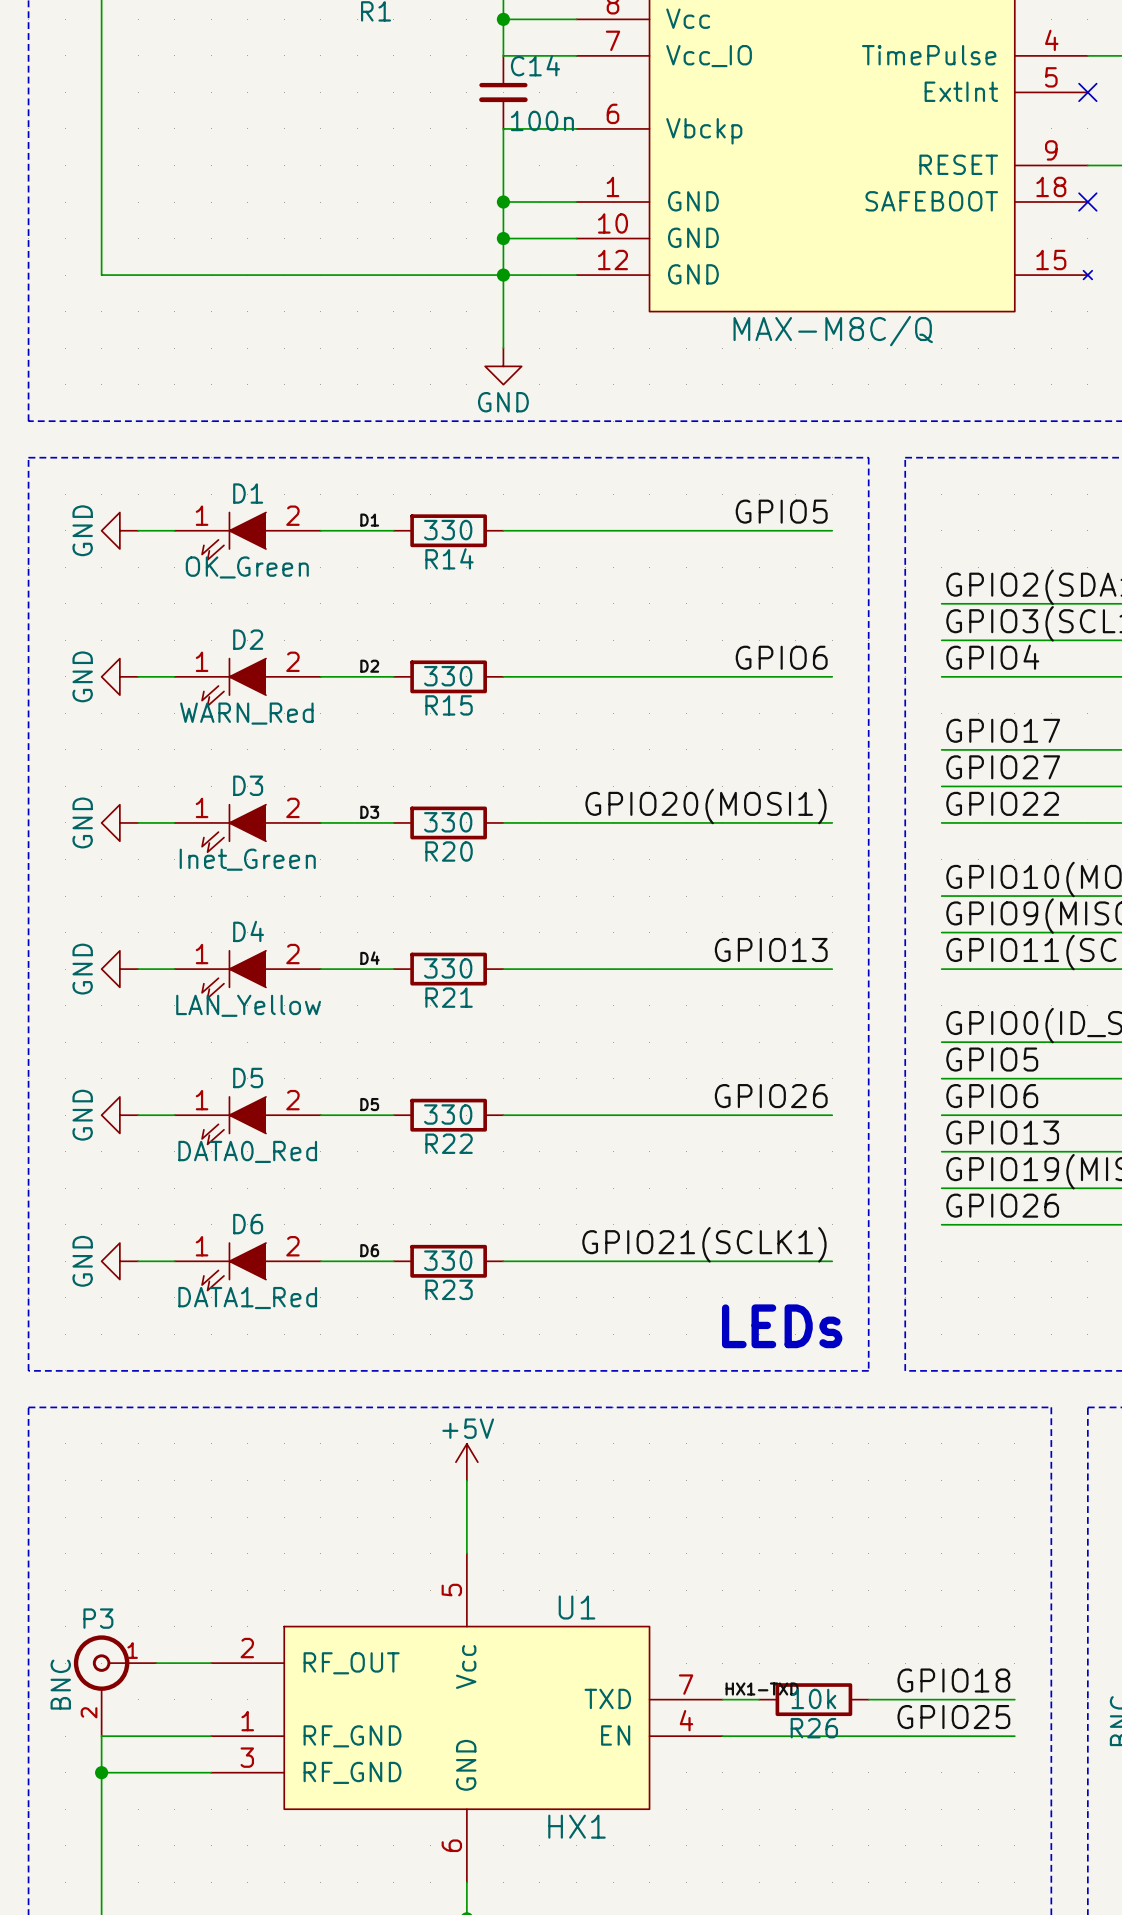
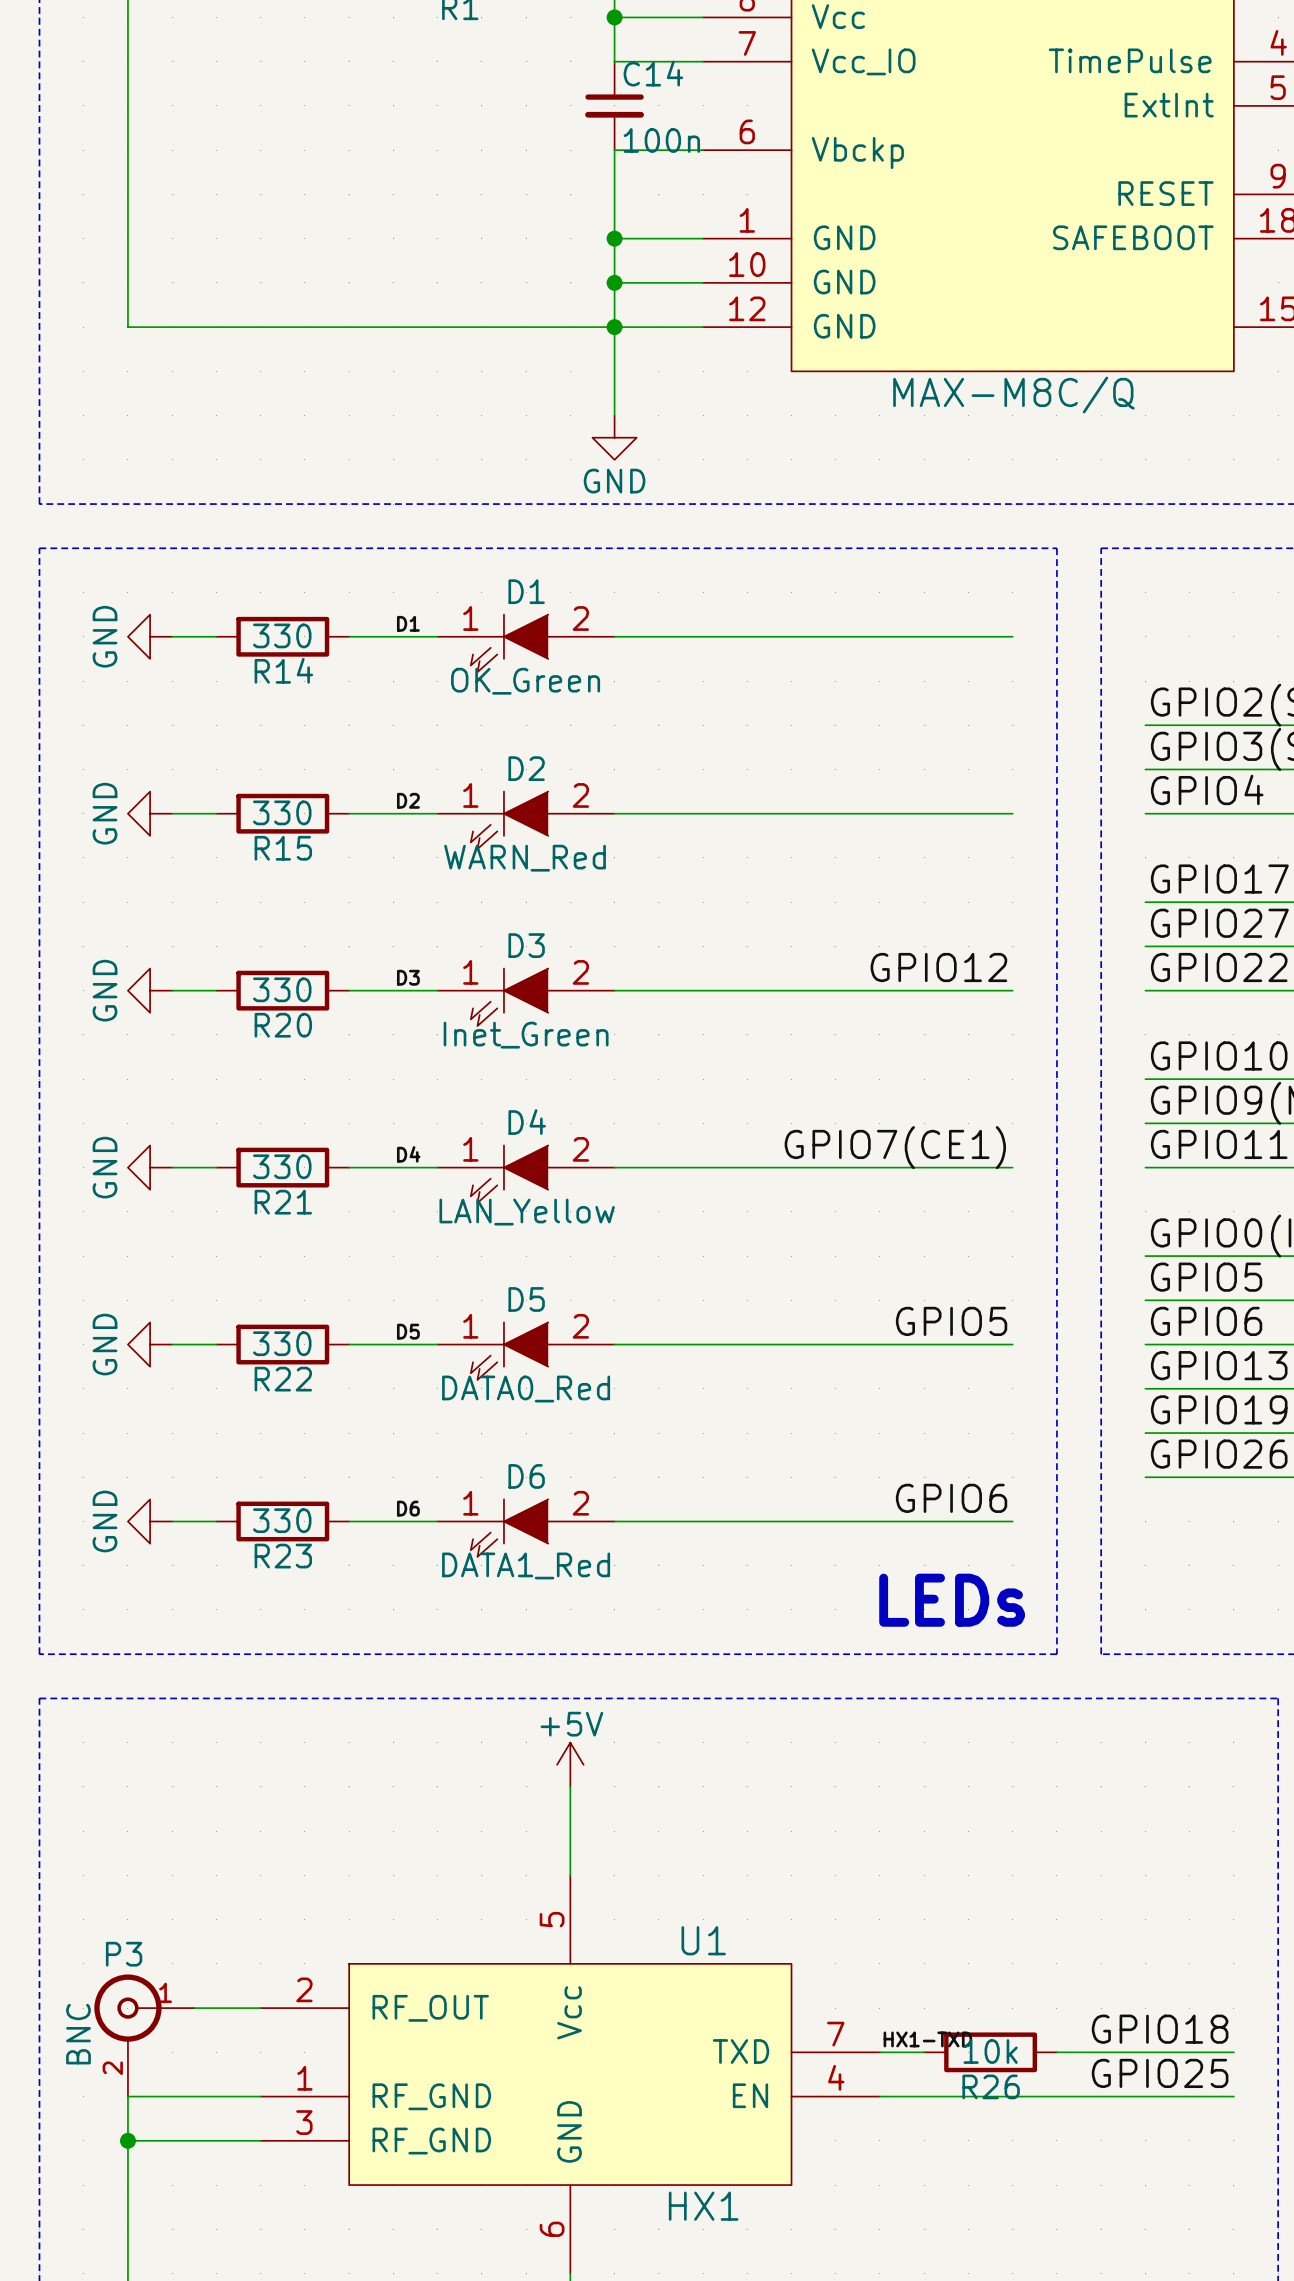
label: GPIO5 (781, 511) -> none
label position: D1 (369, 520) -> D1 (408, 623)
R14 position: (448, 530) -> (282, 636)
D1 position: (247, 536) -> (526, 643)
label: GPIO6 (781, 657) -> none
label position: D2 (369, 666) -> D2 (408, 800)
R15 position: (448, 676) -> (282, 813)
D2 position: (247, 682) -> (526, 820)
label: GPIO20(MOSI1) (706, 806) -> GPIO12 (938, 967)
label position: D3 (369, 812) -> D3 (408, 977)
R20 position: (448, 822) -> (282, 990)
D3 position: (247, 828) -> (526, 997)
label: GPIO13 (771, 949) -> GPIO7(CE1) (895, 1147)
label position: D4 (369, 958) -> D4 (408, 1154)
R21 position: (448, 969) -> (282, 1167)
D4 position: (247, 974) -> (526, 1174)
label: GPIO26 (771, 1096) -> GPIO5 (951, 1321)
label position: D5 (369, 1104) -> D5 (408, 1331)
R22 position: (448, 1115) -> (282, 1344)
D5 position: (247, 1120) -> (526, 1351)
label: GPIO21(SCLK1) (704, 1244) -> GPIO6 (951, 1498)
label position: D6 (369, 1250) -> D6 (408, 1508)
R23 position: (448, 1261) -> (282, 1521)
D6 position: (247, 1266) -> (526, 1528)

